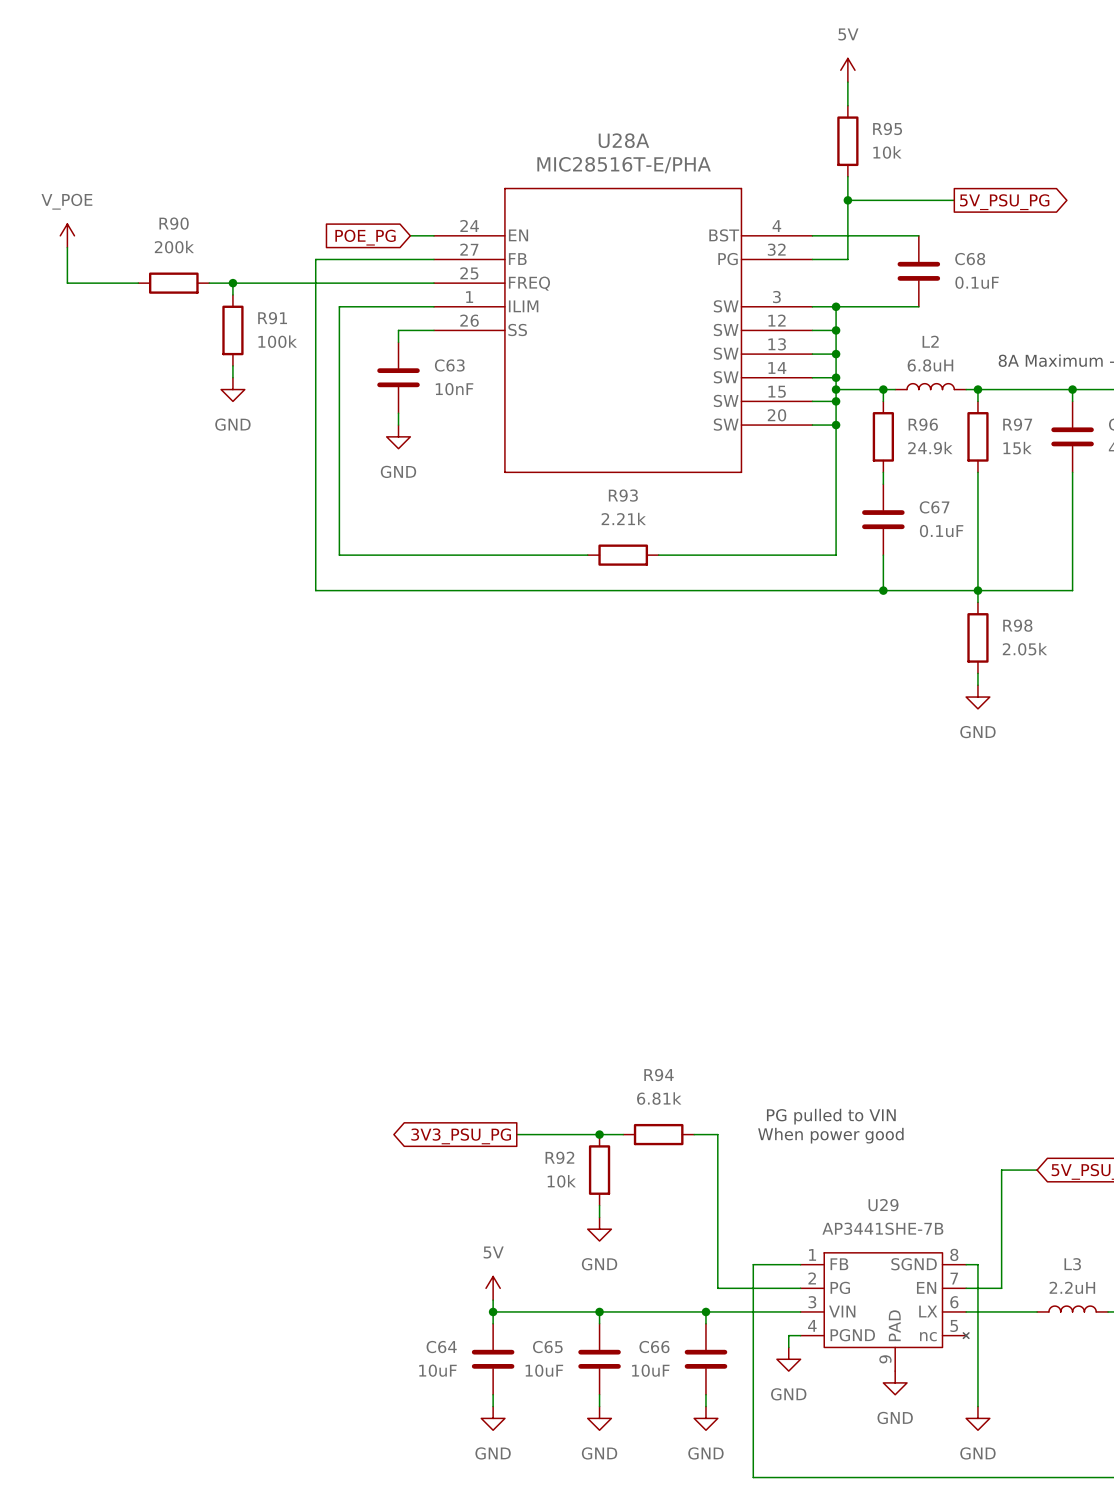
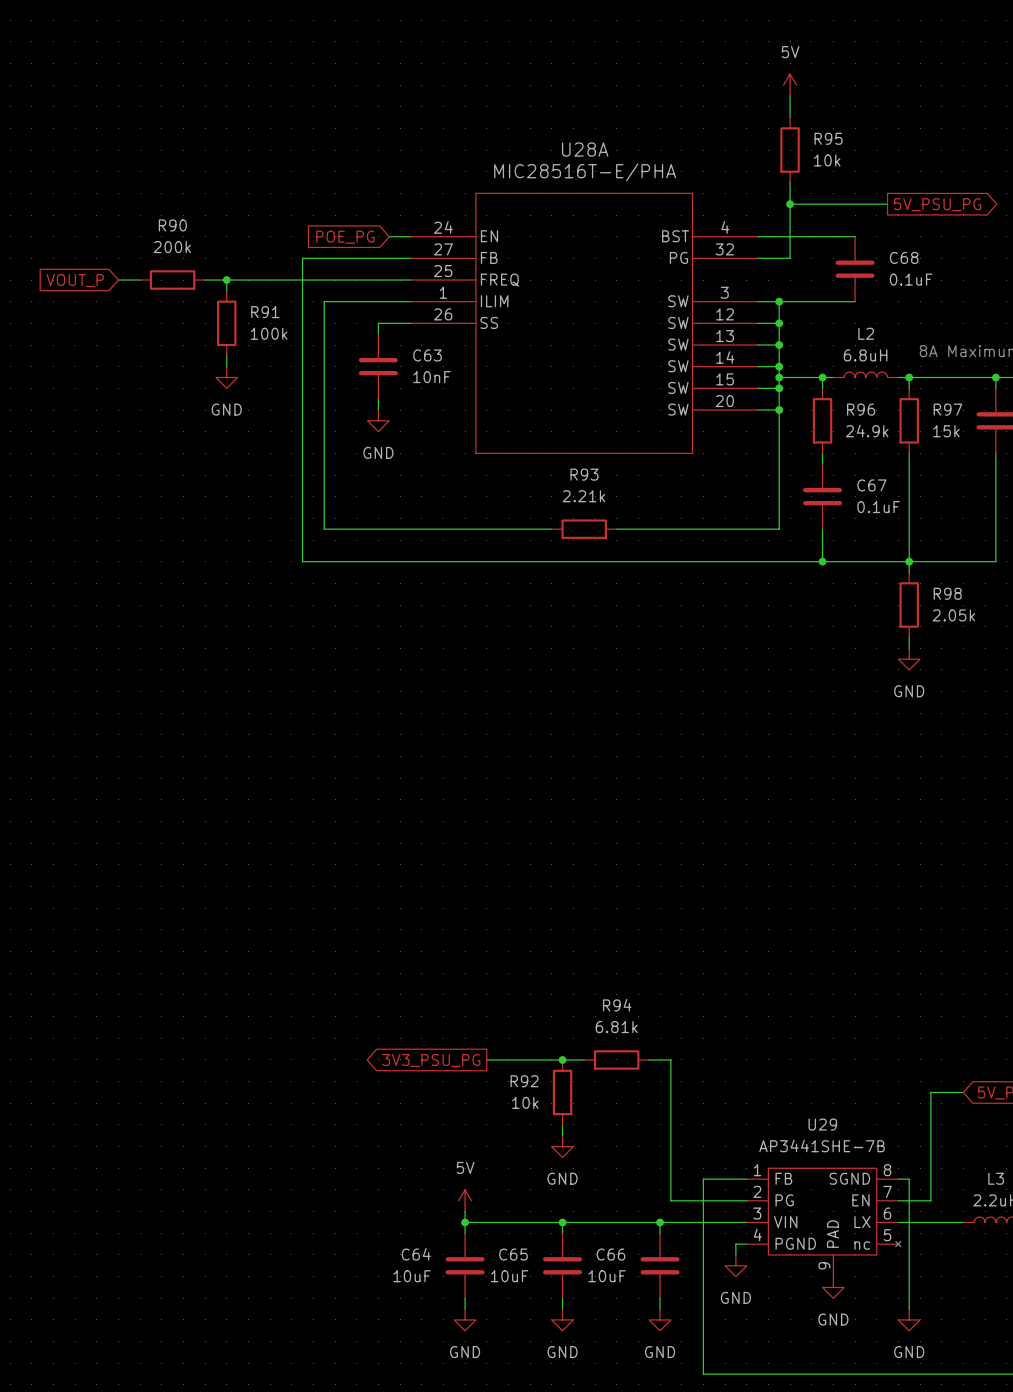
power symbol: V_POE (67, 235) -> none
wire: (67, 247) (67, 283) (114, 283) -> none
global label: none -> VOUT_P (75, 280)
text: PG pulled to VIN (831, 1116) -> none
text: When power good (830, 1135) -> none

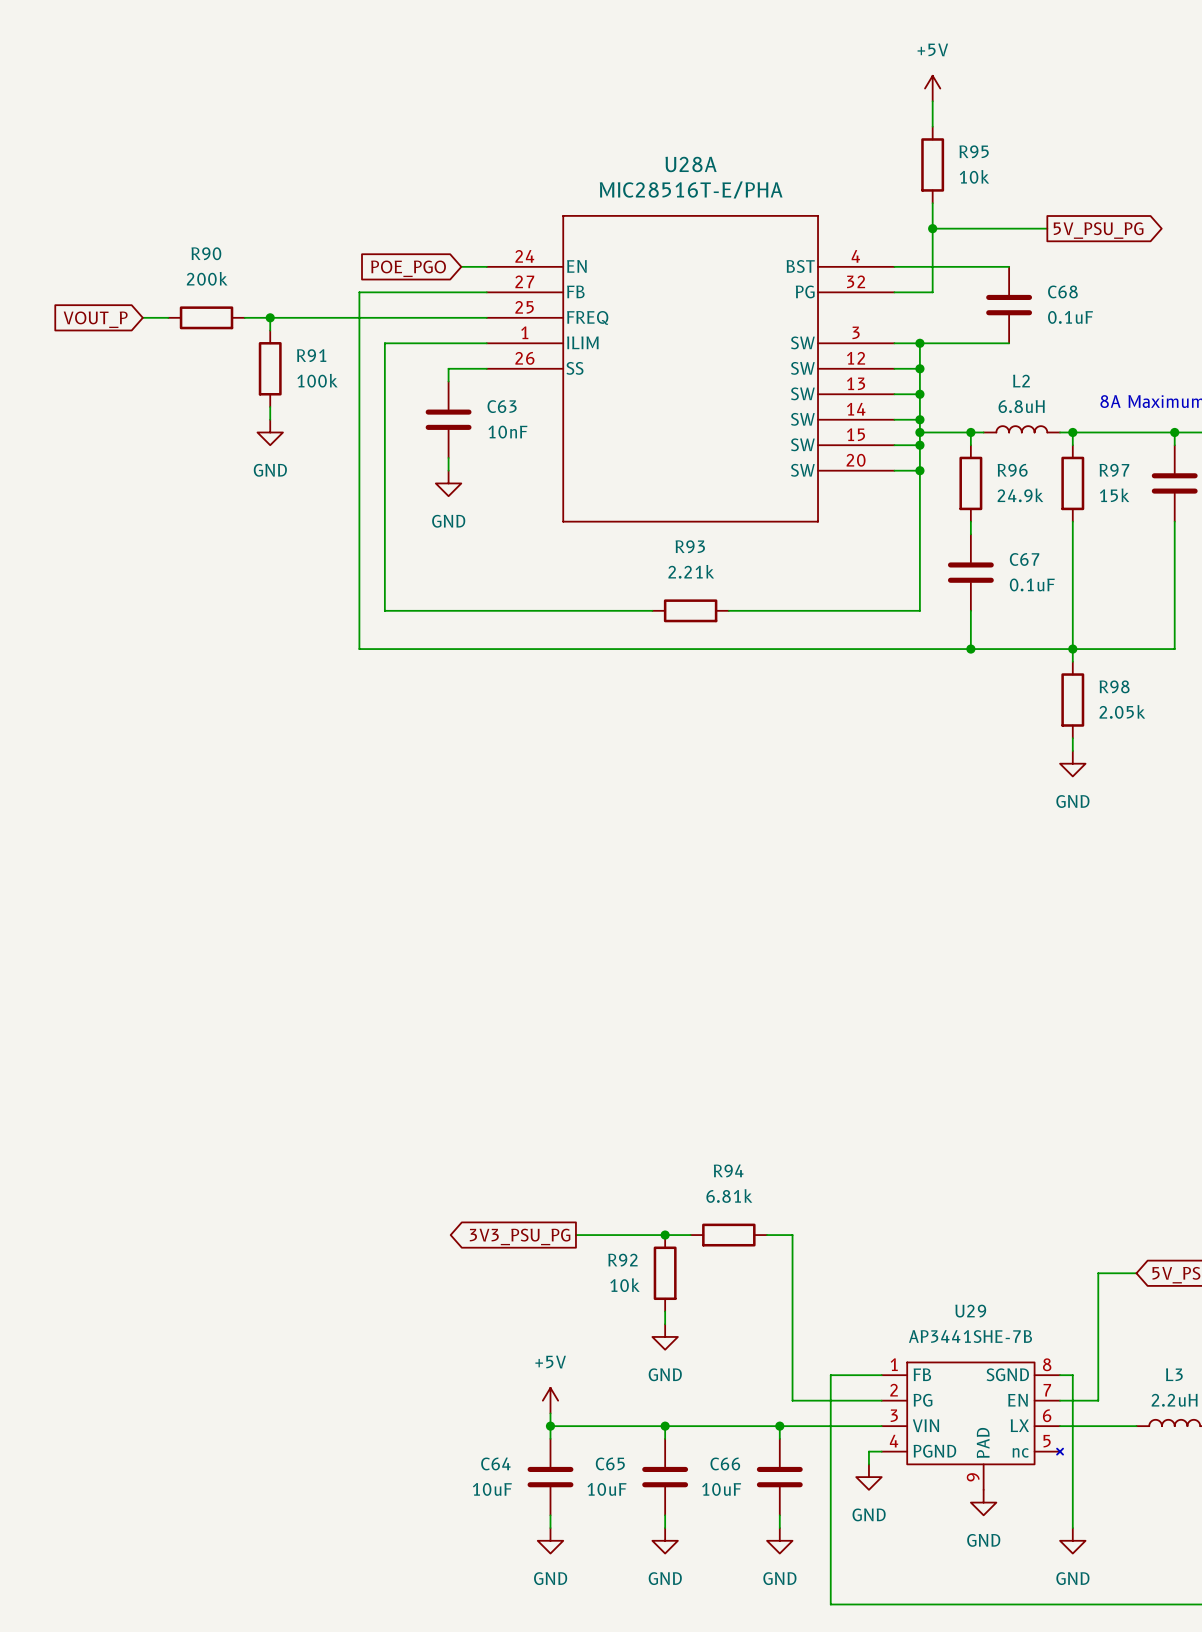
power symbol: 5V (790, 85) -> +5V (932, 88)
global label: POE_PG (345, 237) -> POE_PGO (408, 268)
power symbol: 5V (465, 1200) -> +5V (550, 1400)

